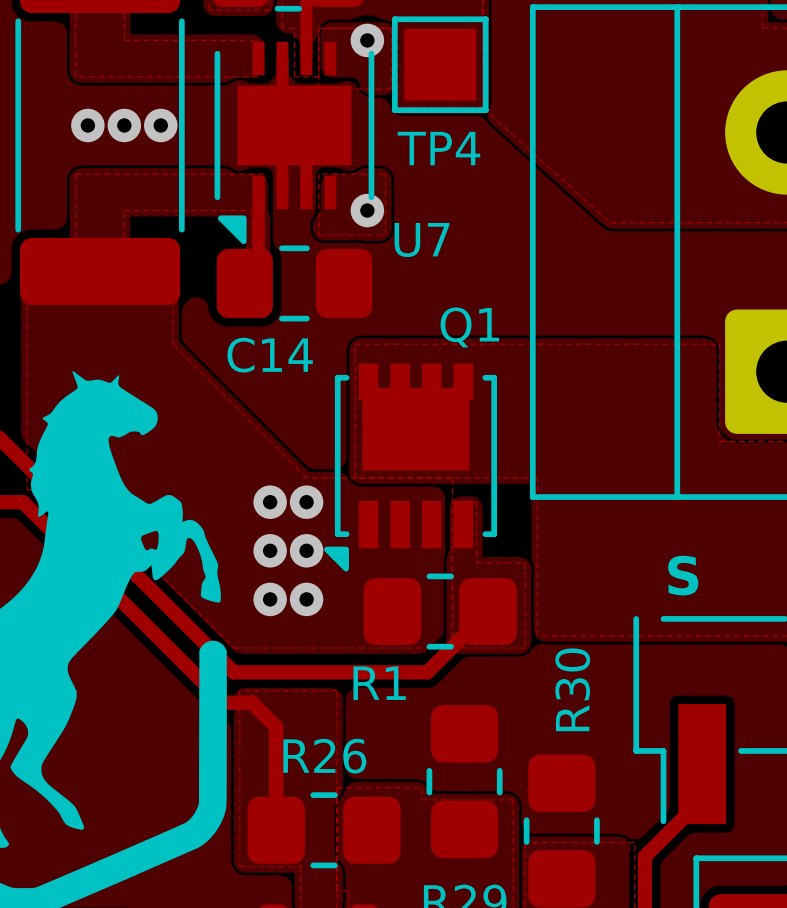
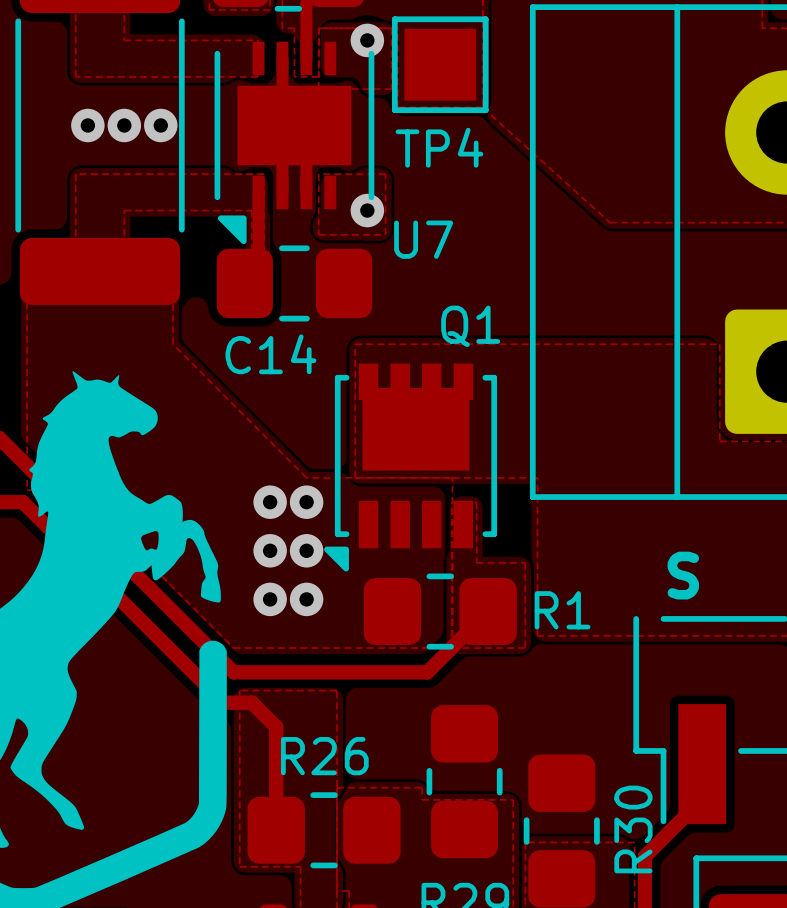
R1 name position: R1 (379, 683) -> R1 (562, 610)
R30 name position: R30 (572, 689) -> R30 (633, 829)

